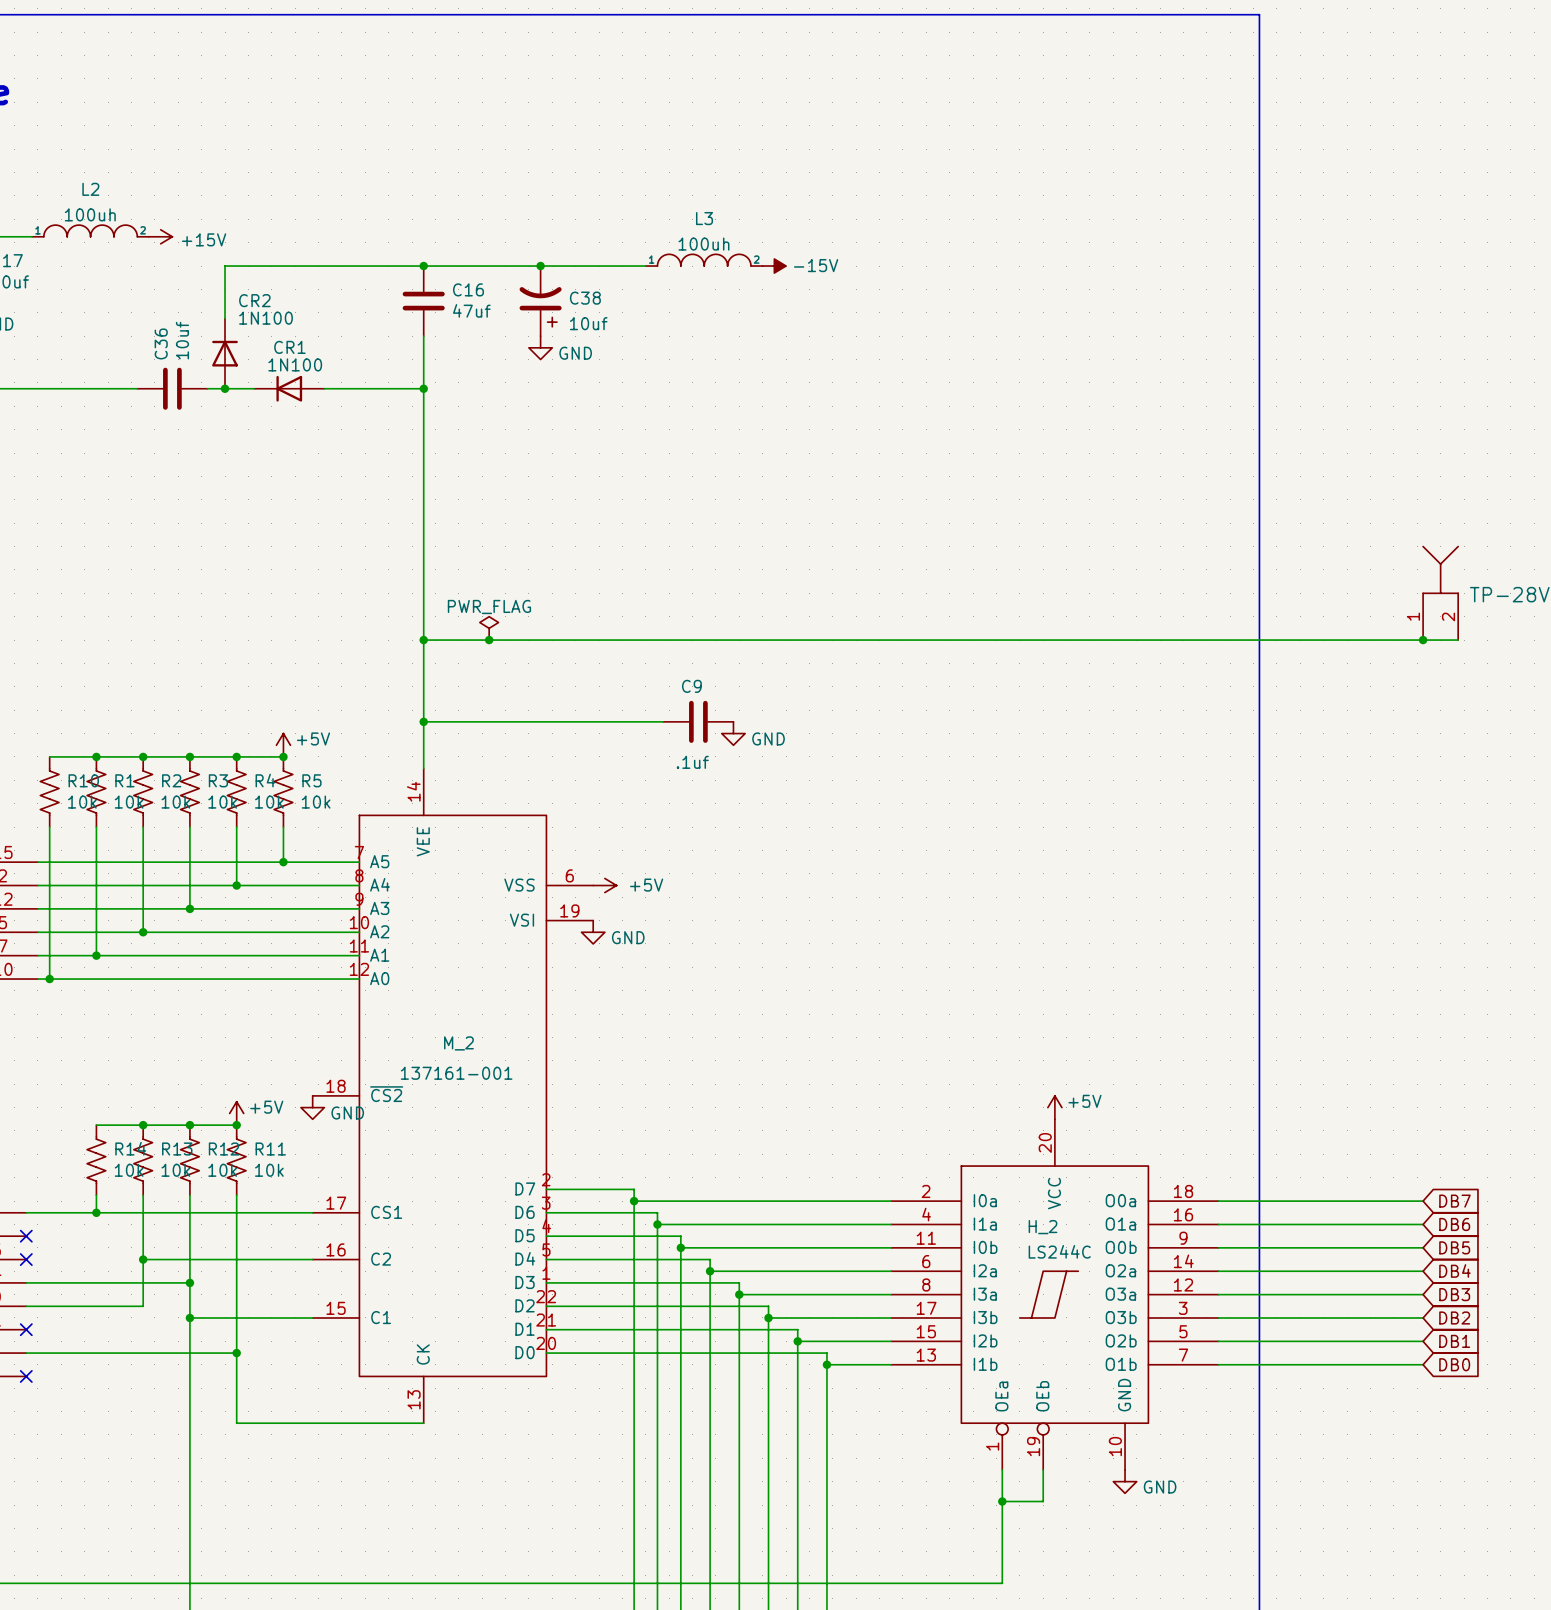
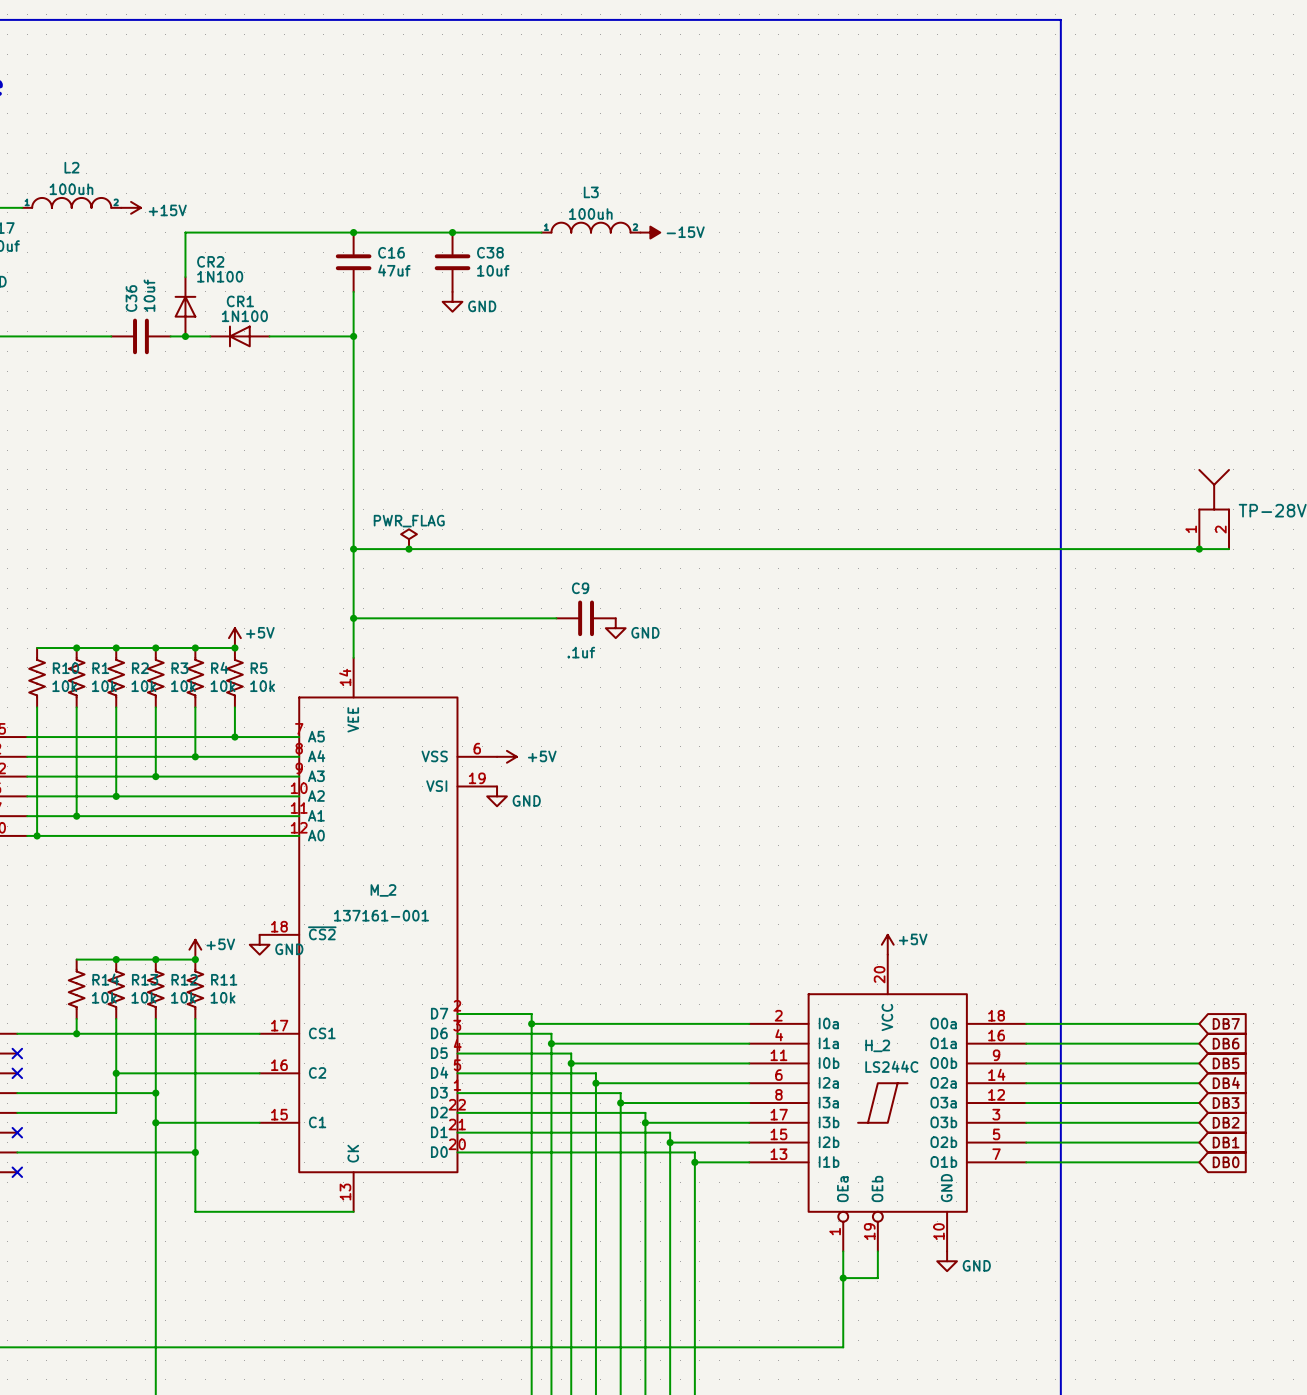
C38 symbol: [519, 266, 562, 337] -> [434, 232, 471, 292]

